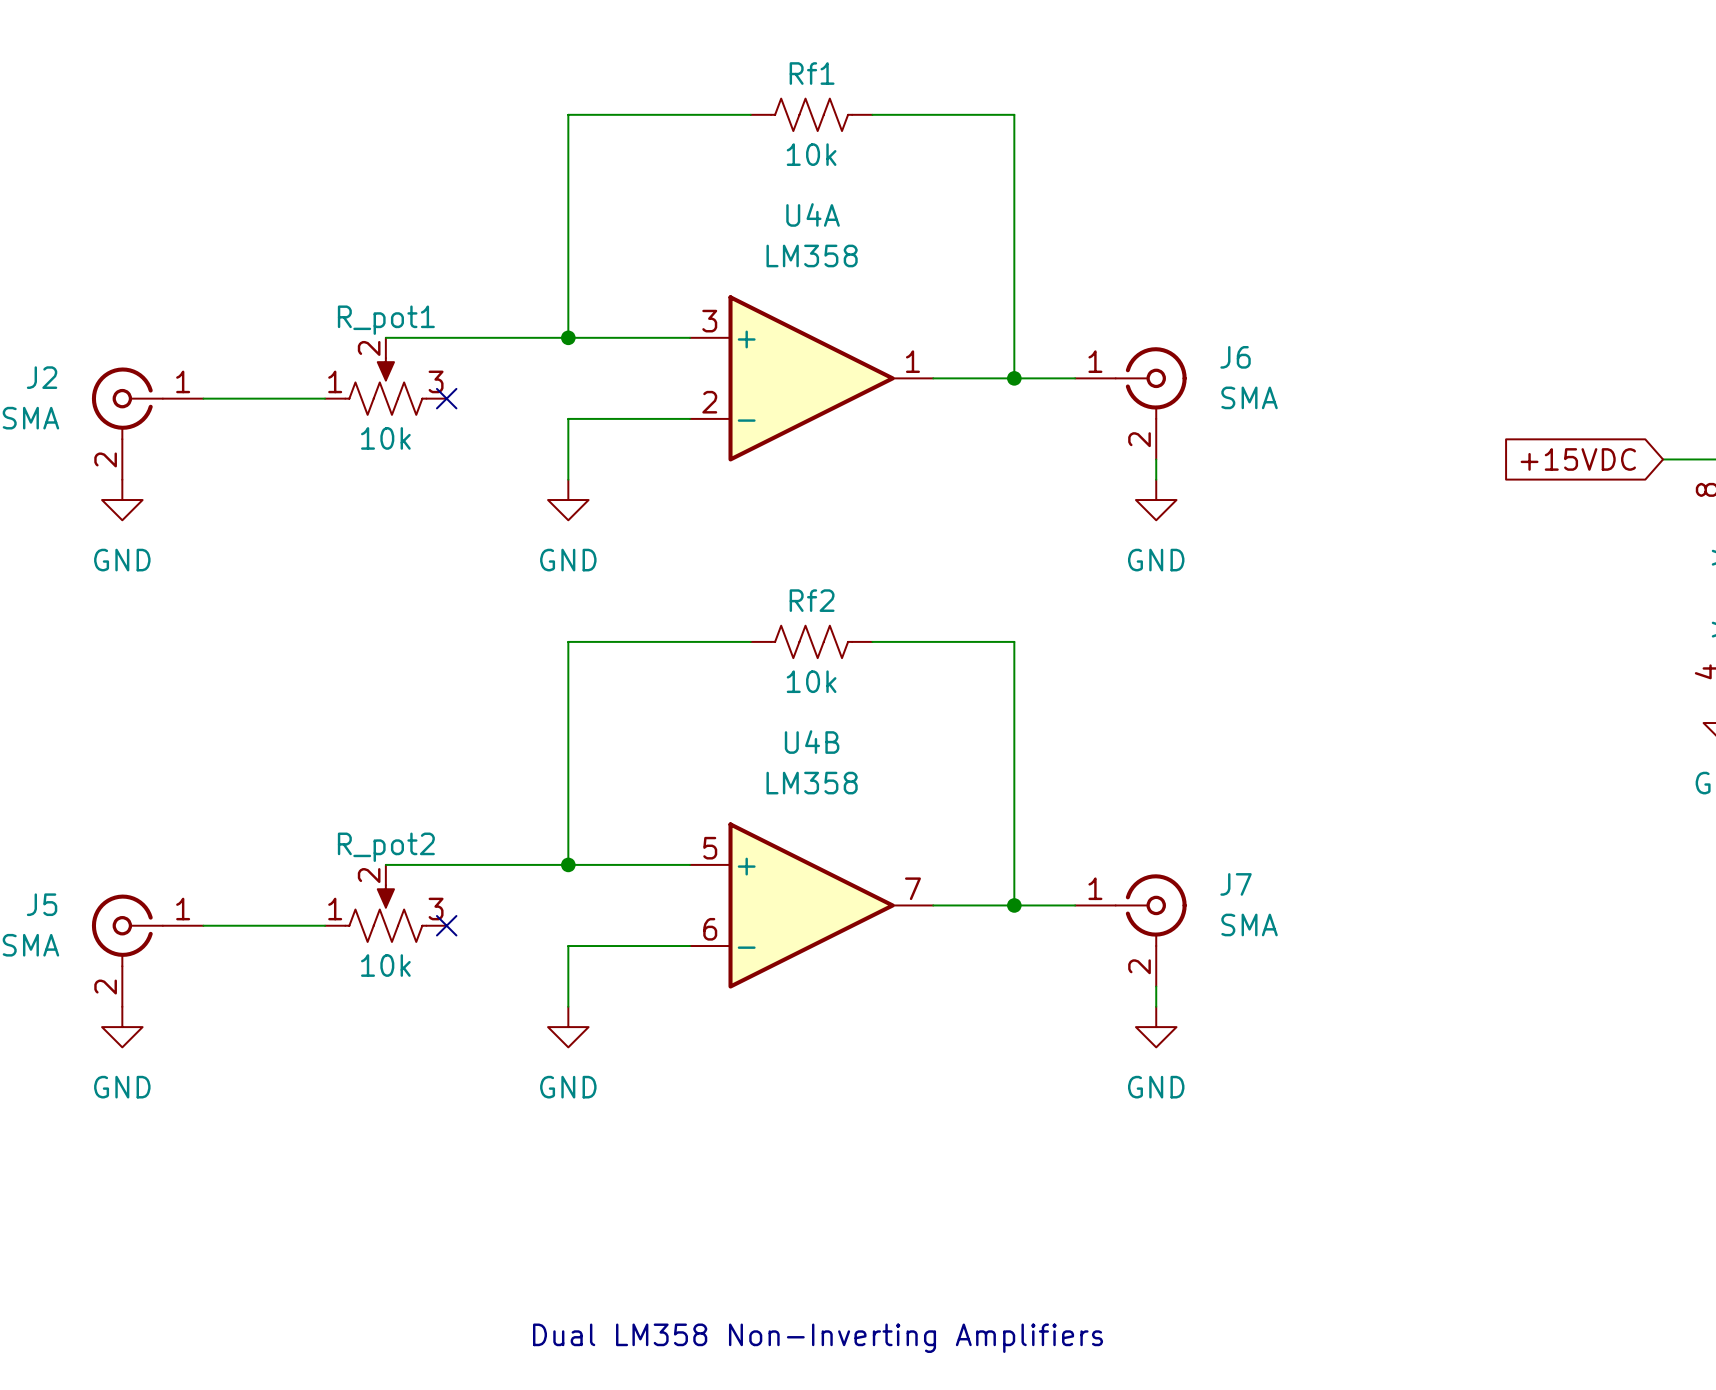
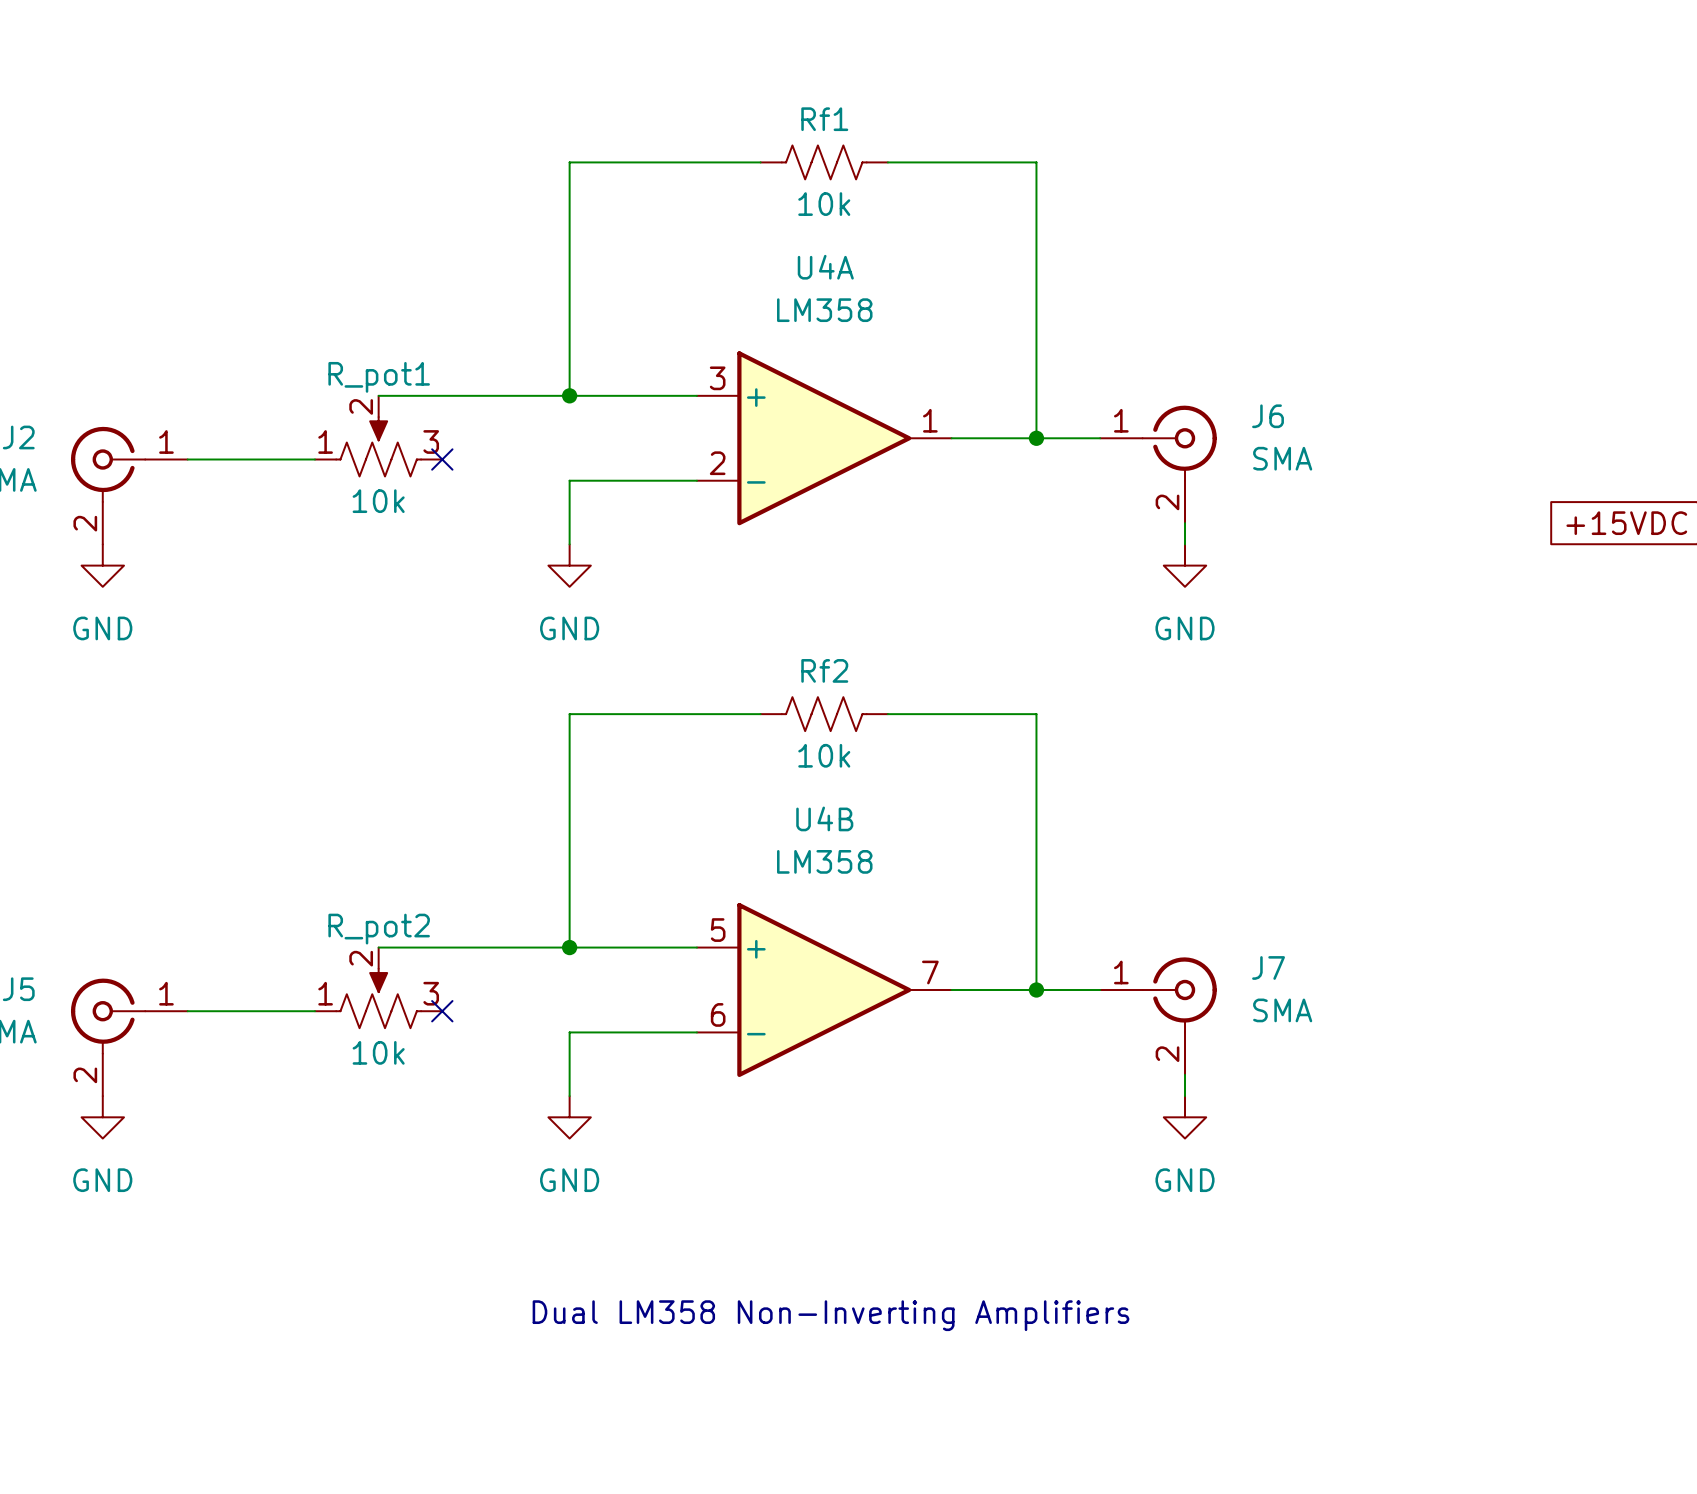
text position: Dual LM358 Non-Inverting Amplifiers (818, 1338) -> Dual LM358 Non-Inverting Amplifiers (830, 1315)

